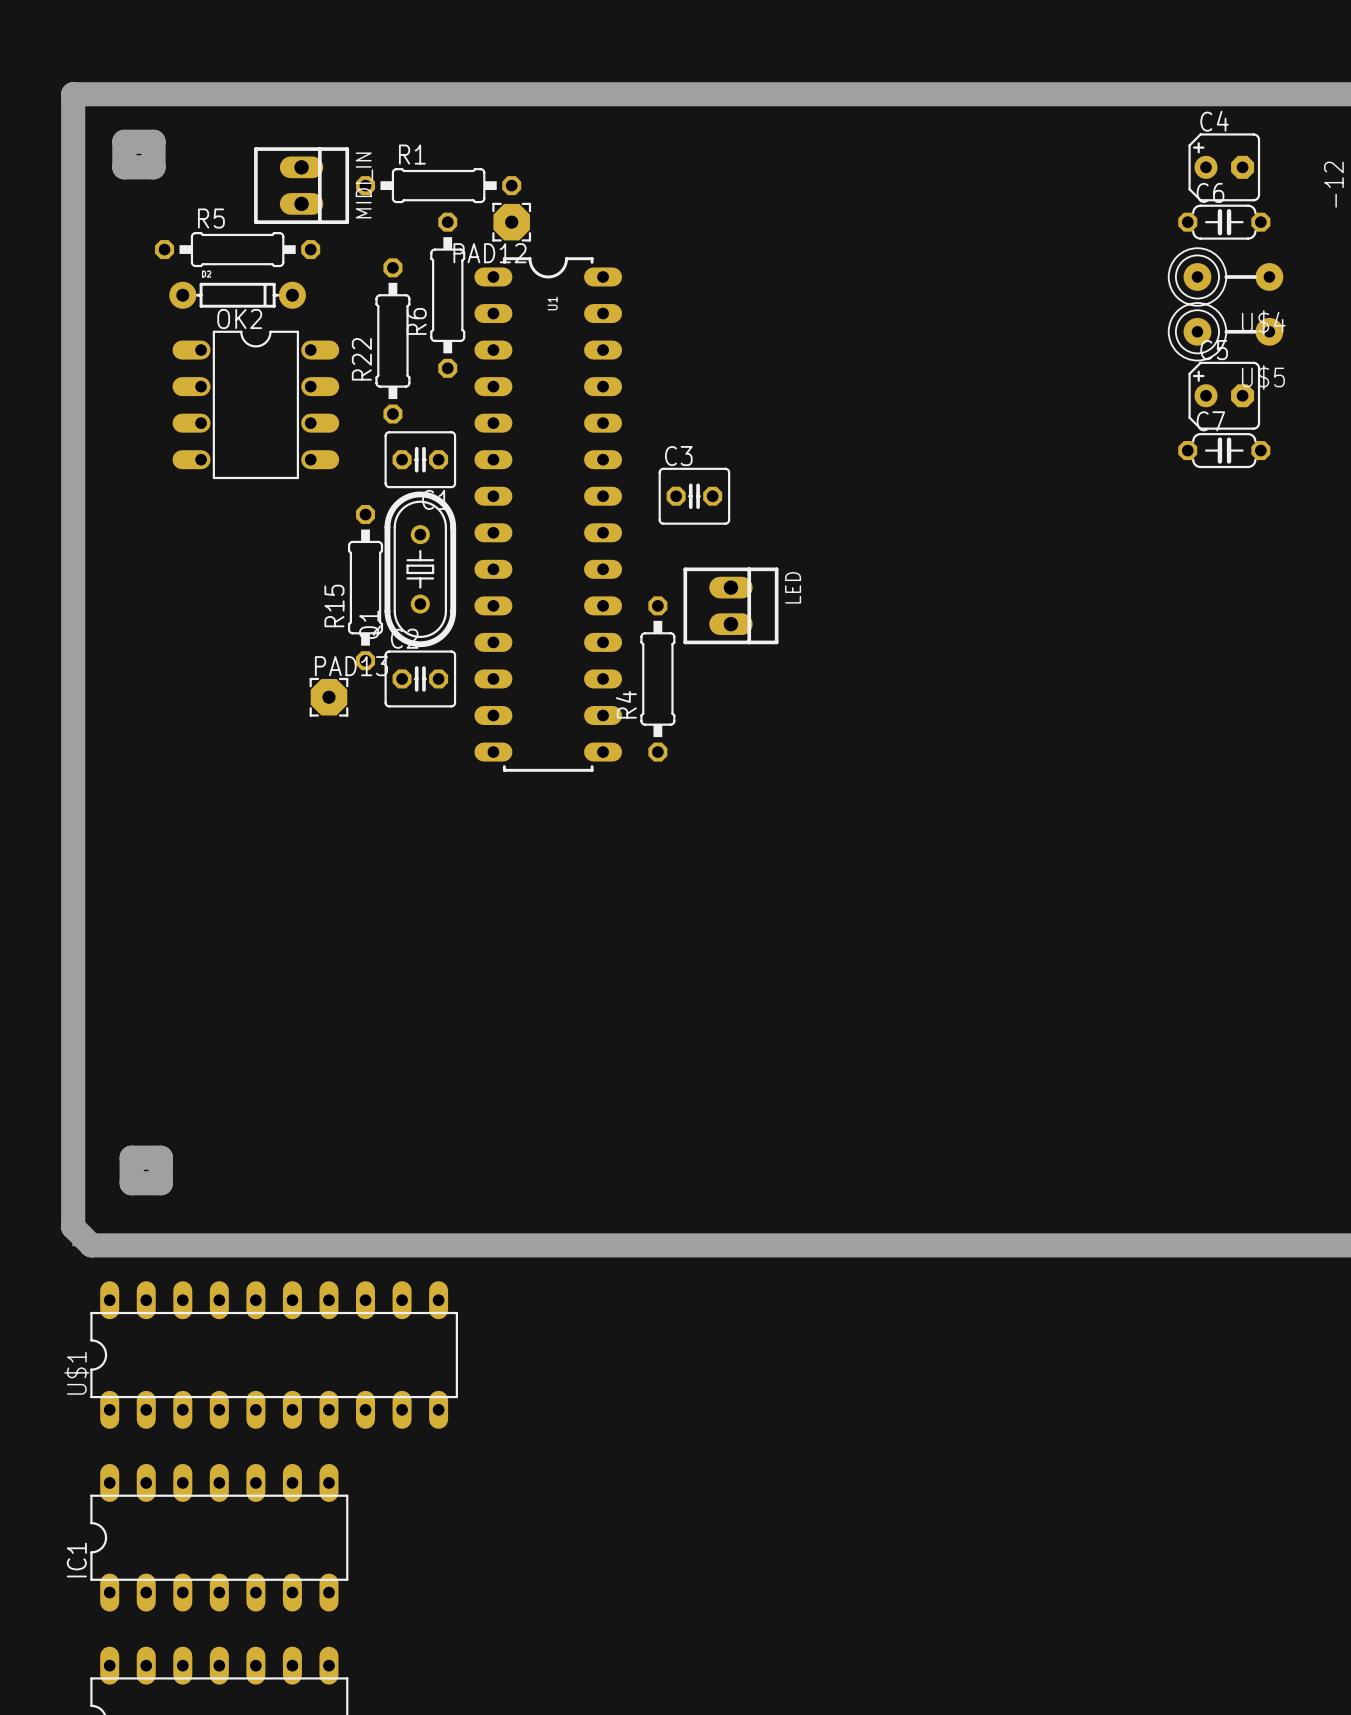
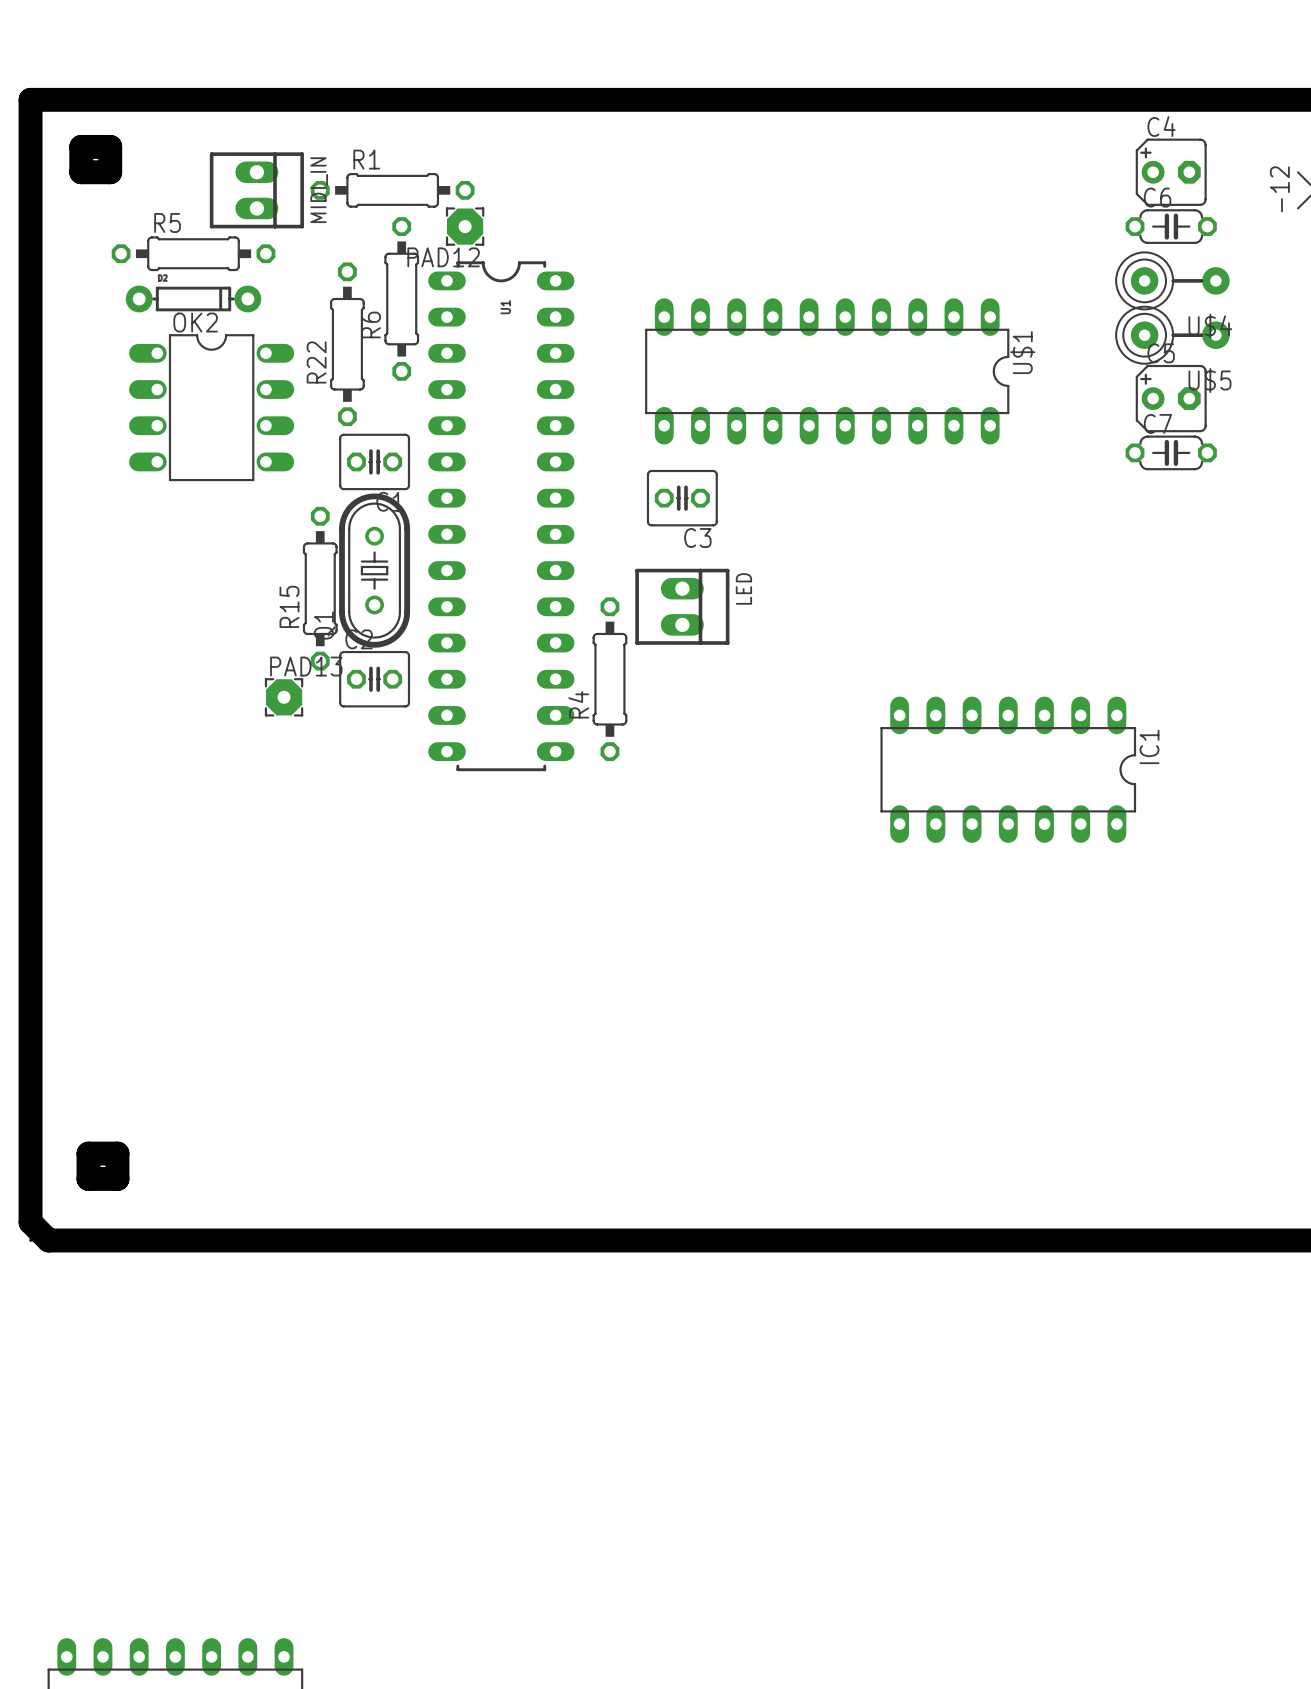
C3 name position: C3 (678, 456) -> C3 (697, 537)
C3 position: (694, 496) -> (682, 498)
U$1 rotation: 0° (274, 1355) -> 180° (827, 371)
U$1 position: (274, 1355) -> (827, 371)
IC1 rotation: 0° (219, 1537) -> 180° (1008, 769)
IC1 position: (219, 1537) -> (1008, 769)

